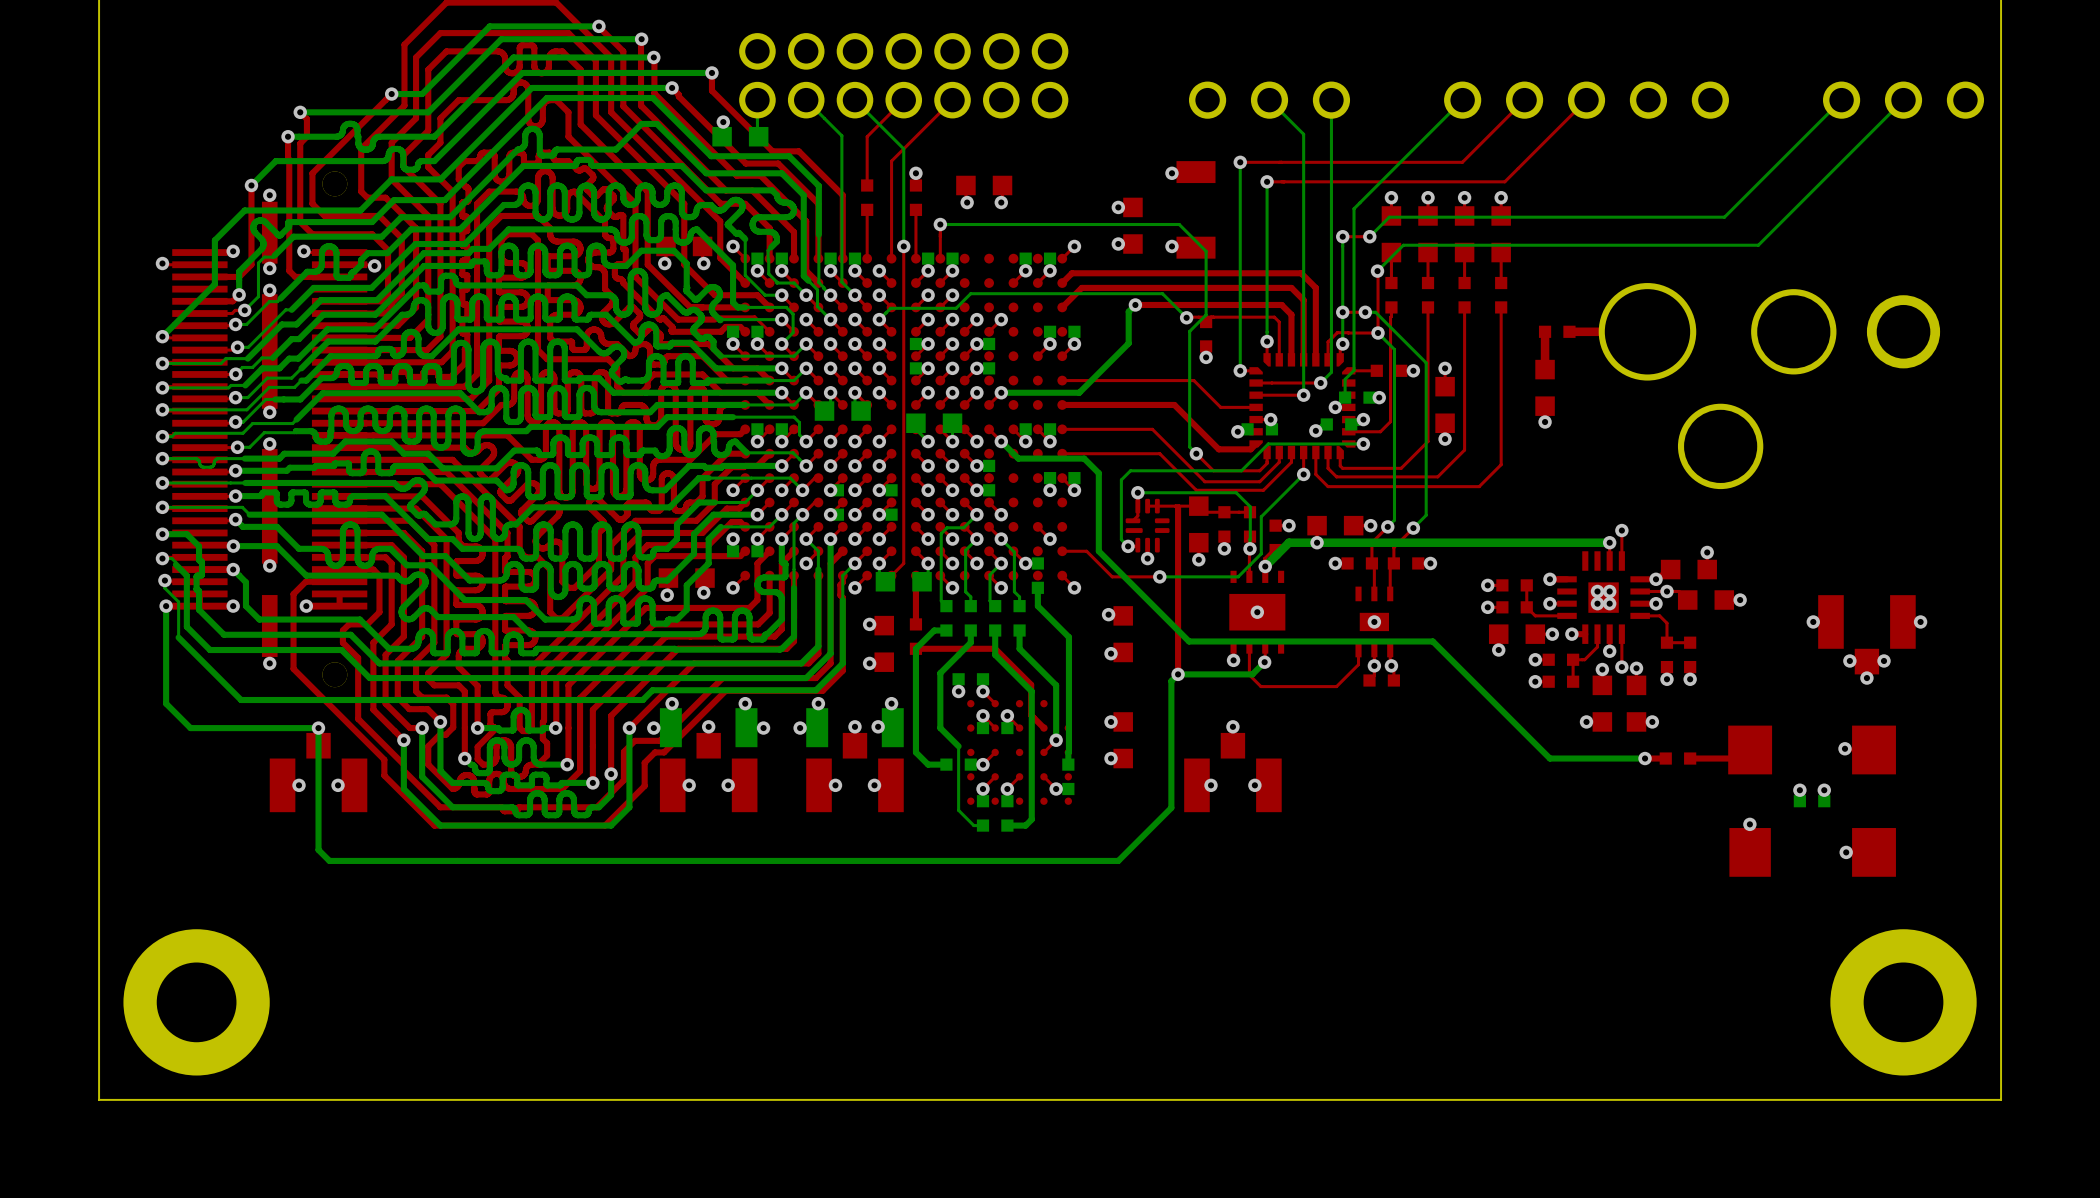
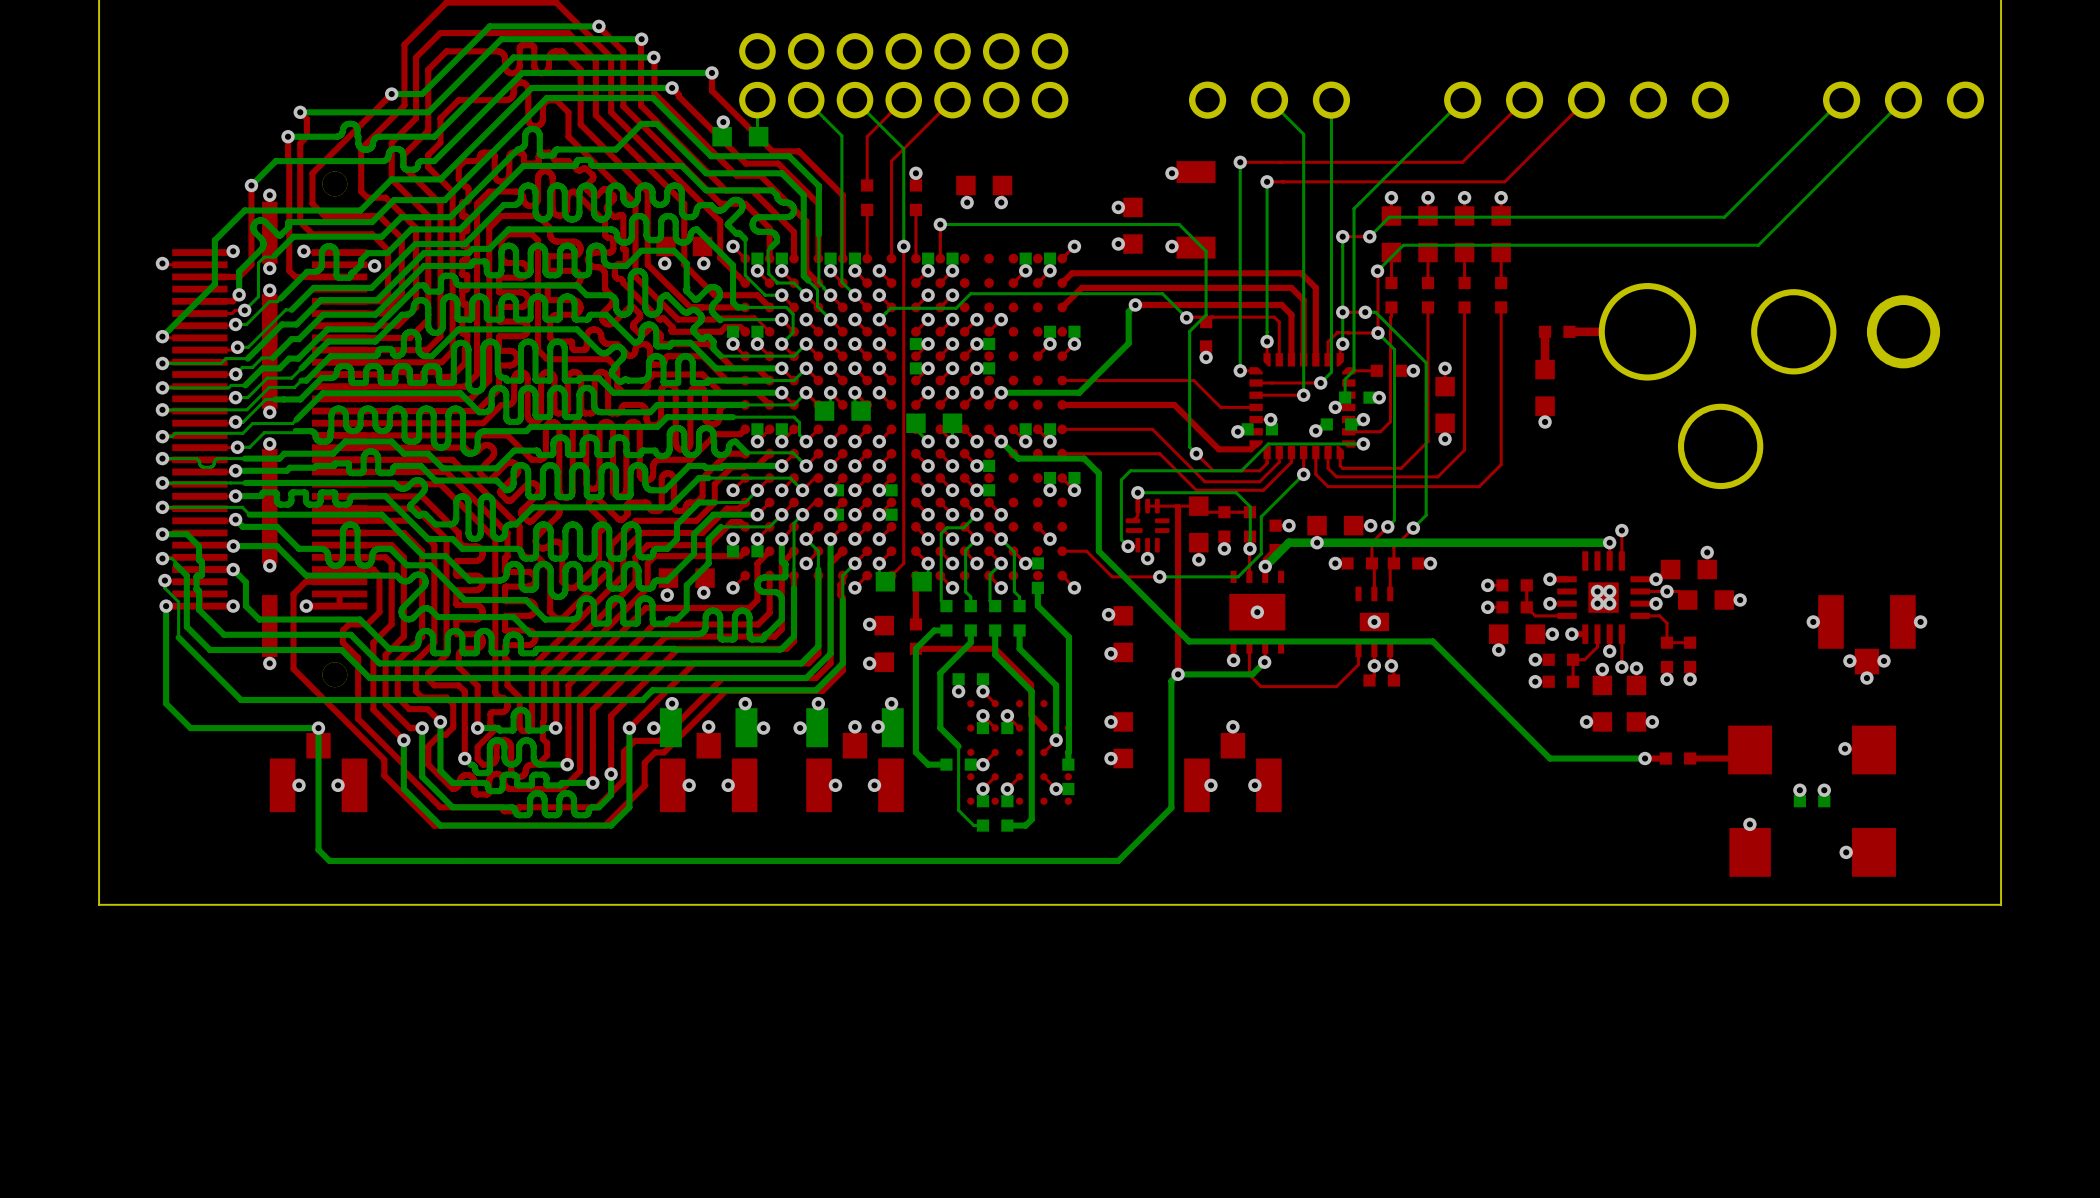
board edge: (2001, 904) (2001, 1099) (99, 1099) (99, 904) -> (2001, 904) (99, 904)
part: (196, 1002) -> none
part: (1903, 1002) -> none

